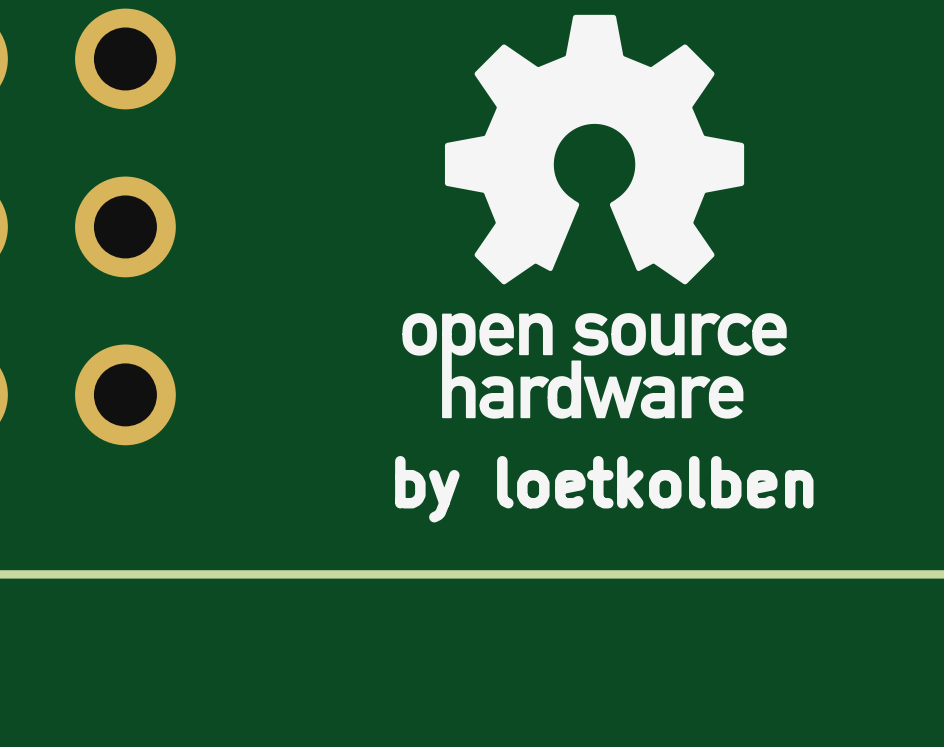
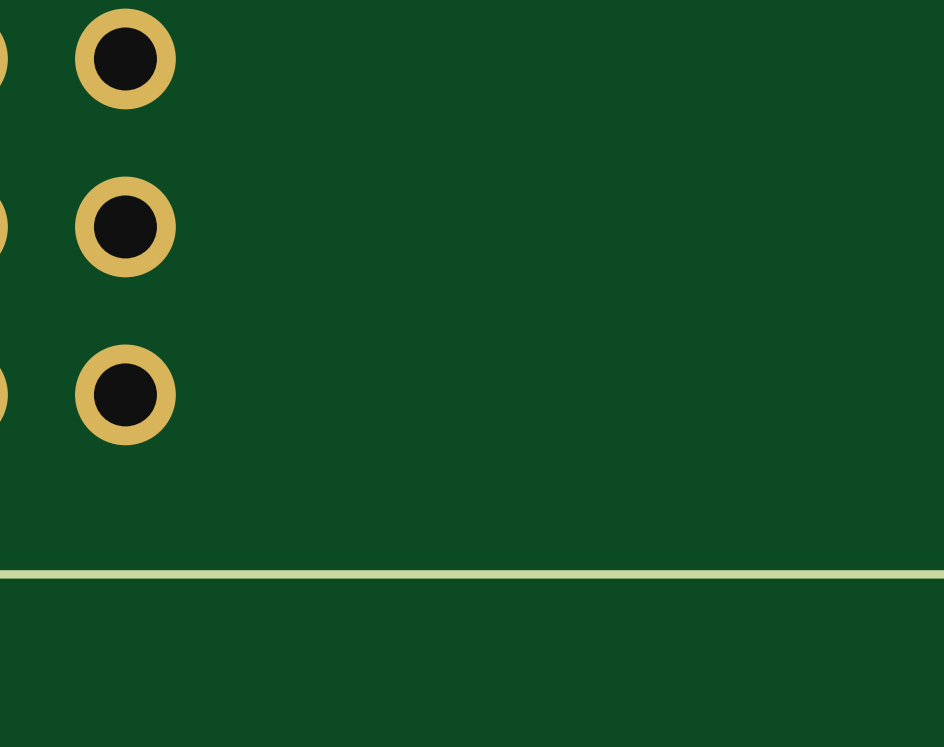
drawing: [402, 14, 787, 419] -> none
text: by loetkolben (604, 489) -> none

